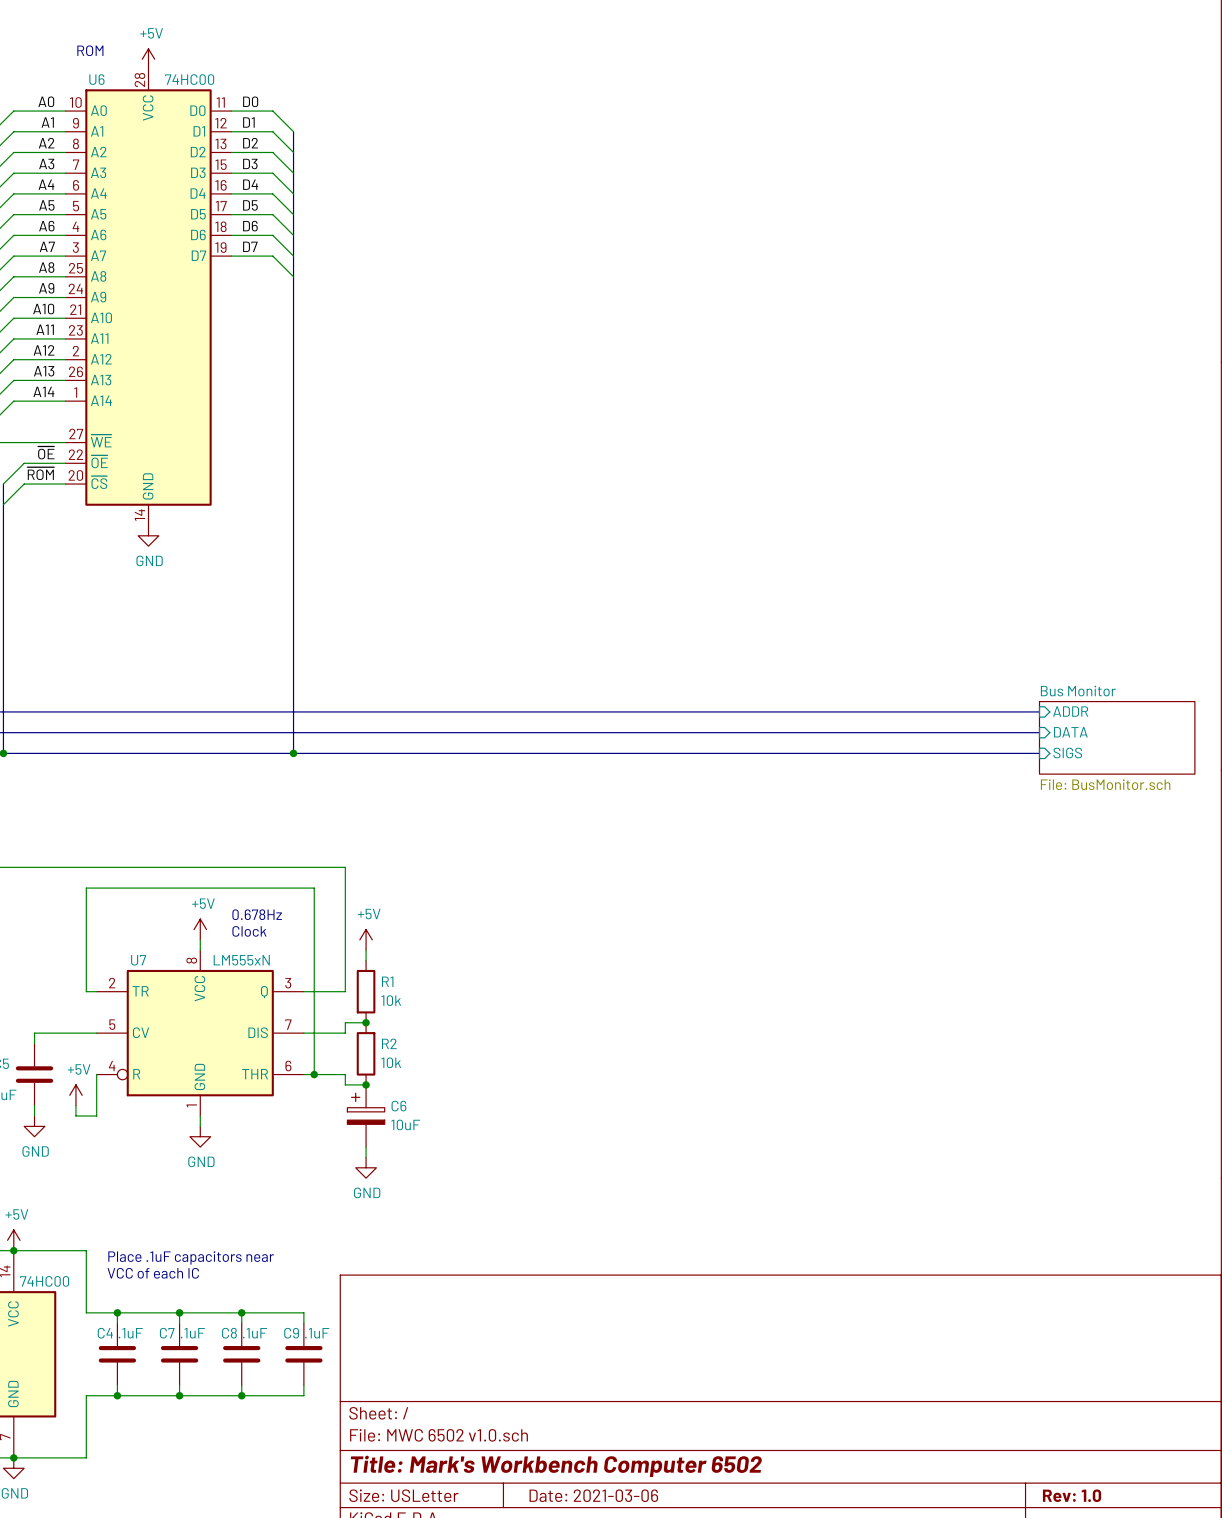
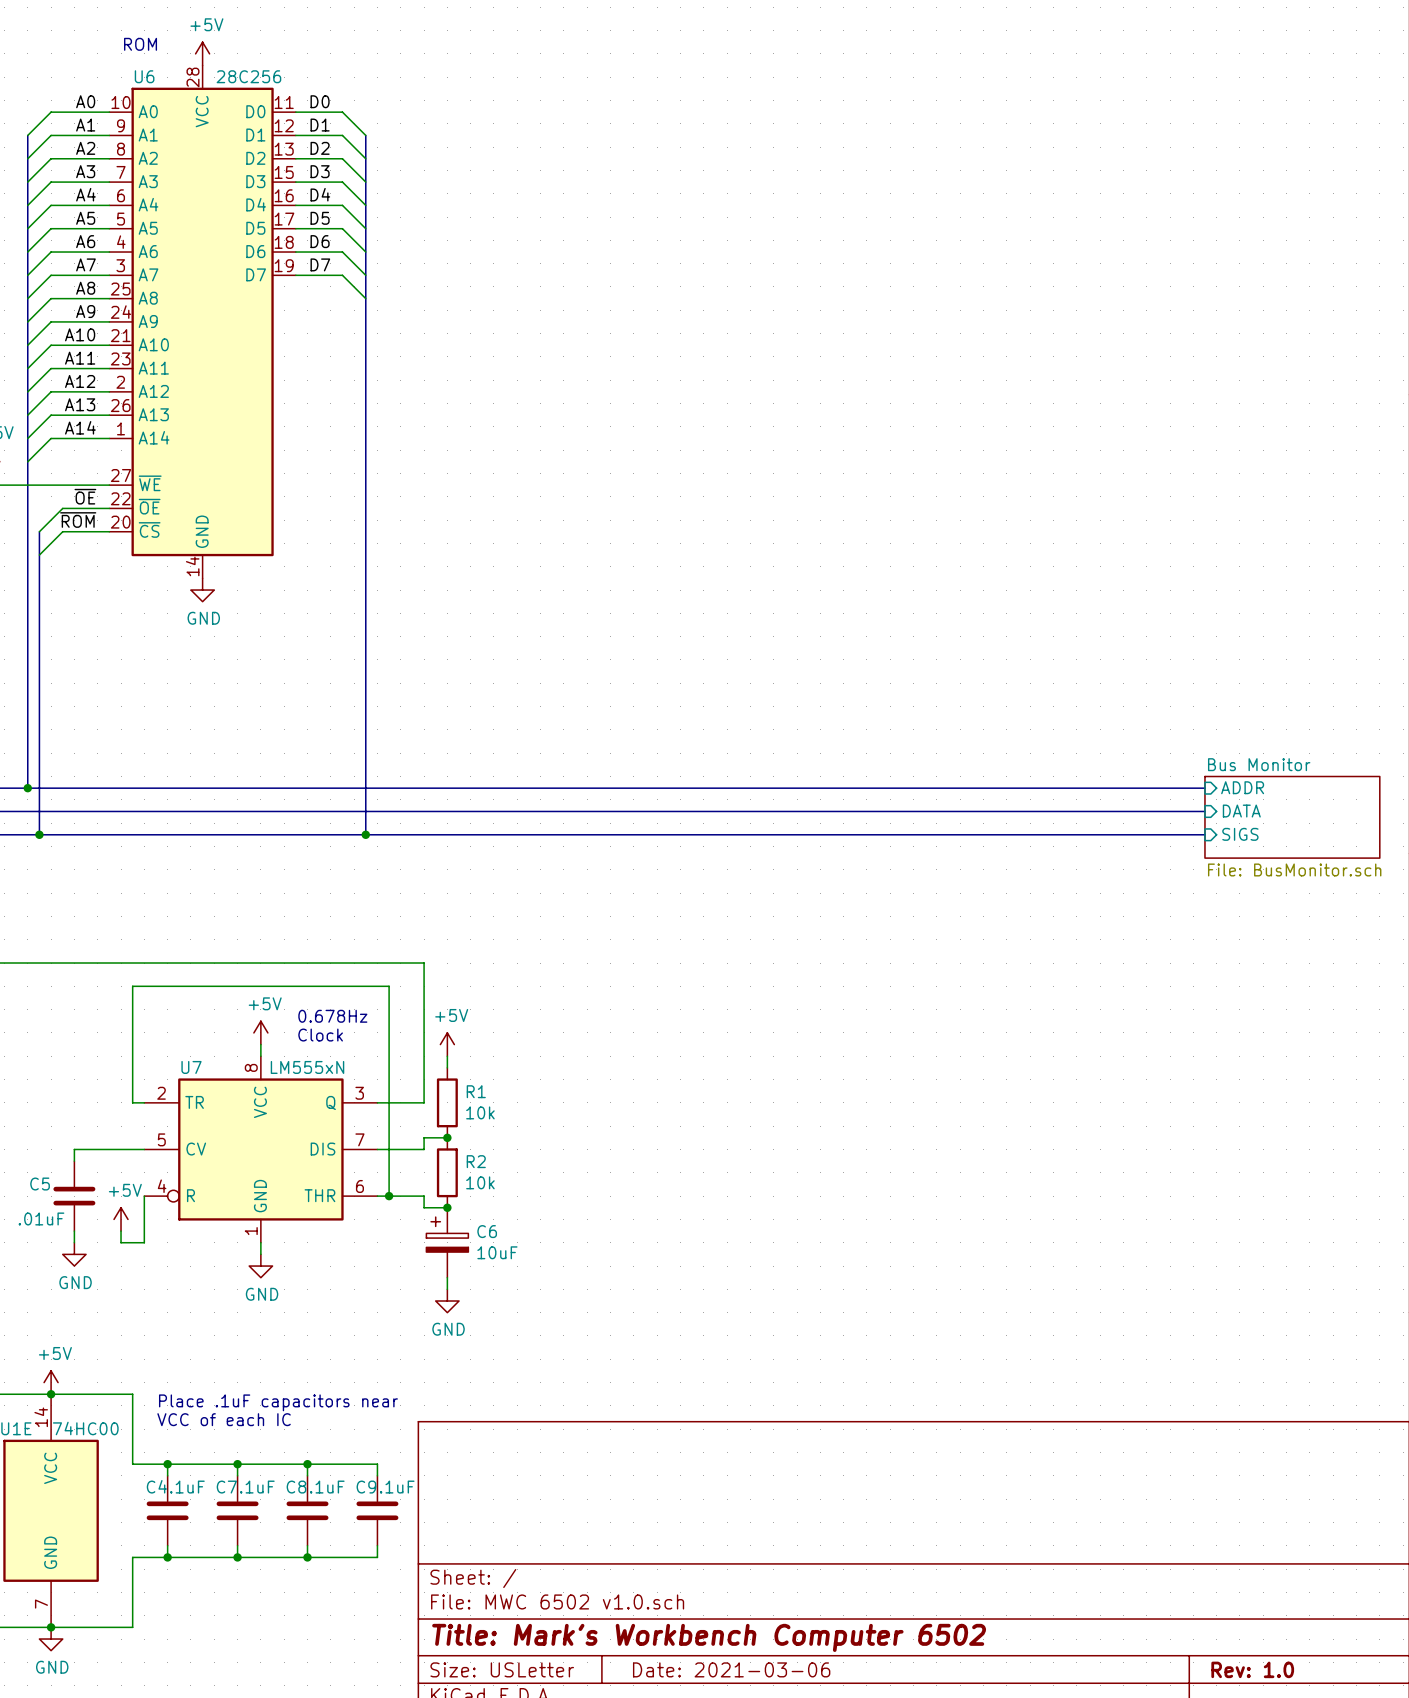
U6 value: 74HC00 (189, 79) -> 28C256 (248, 76)

